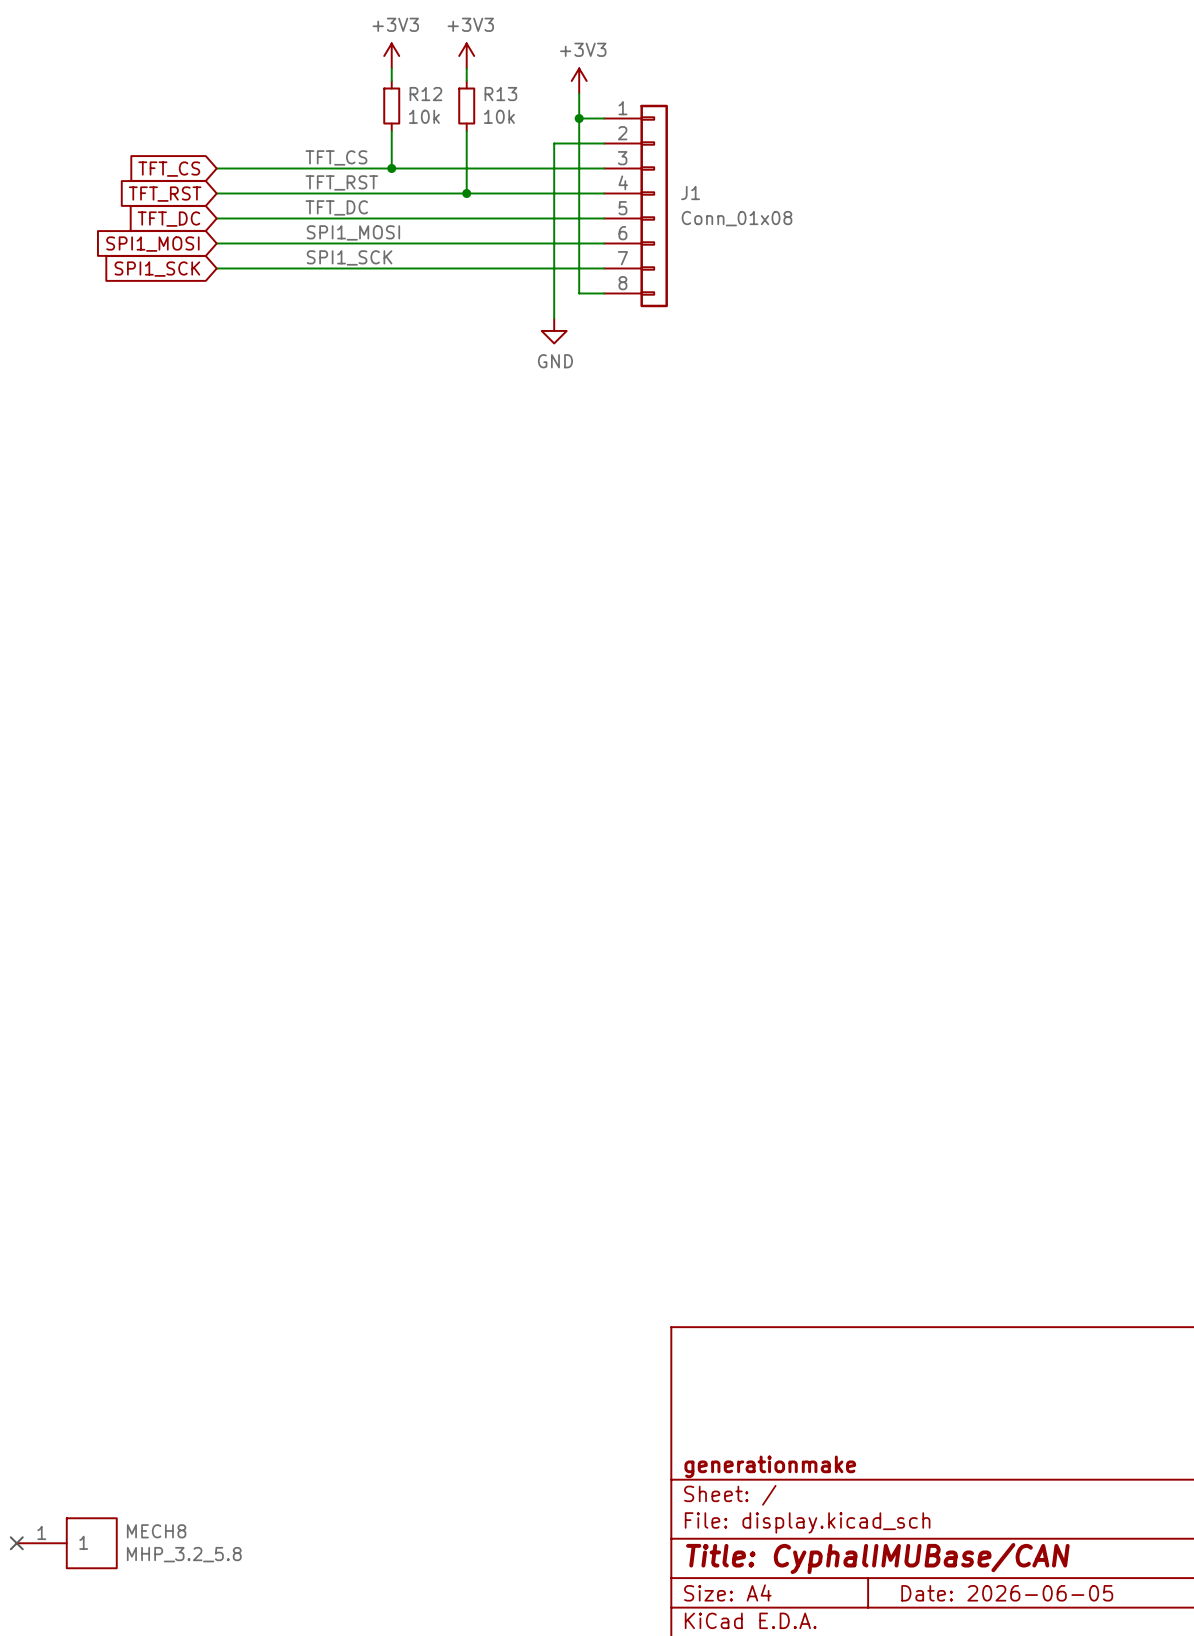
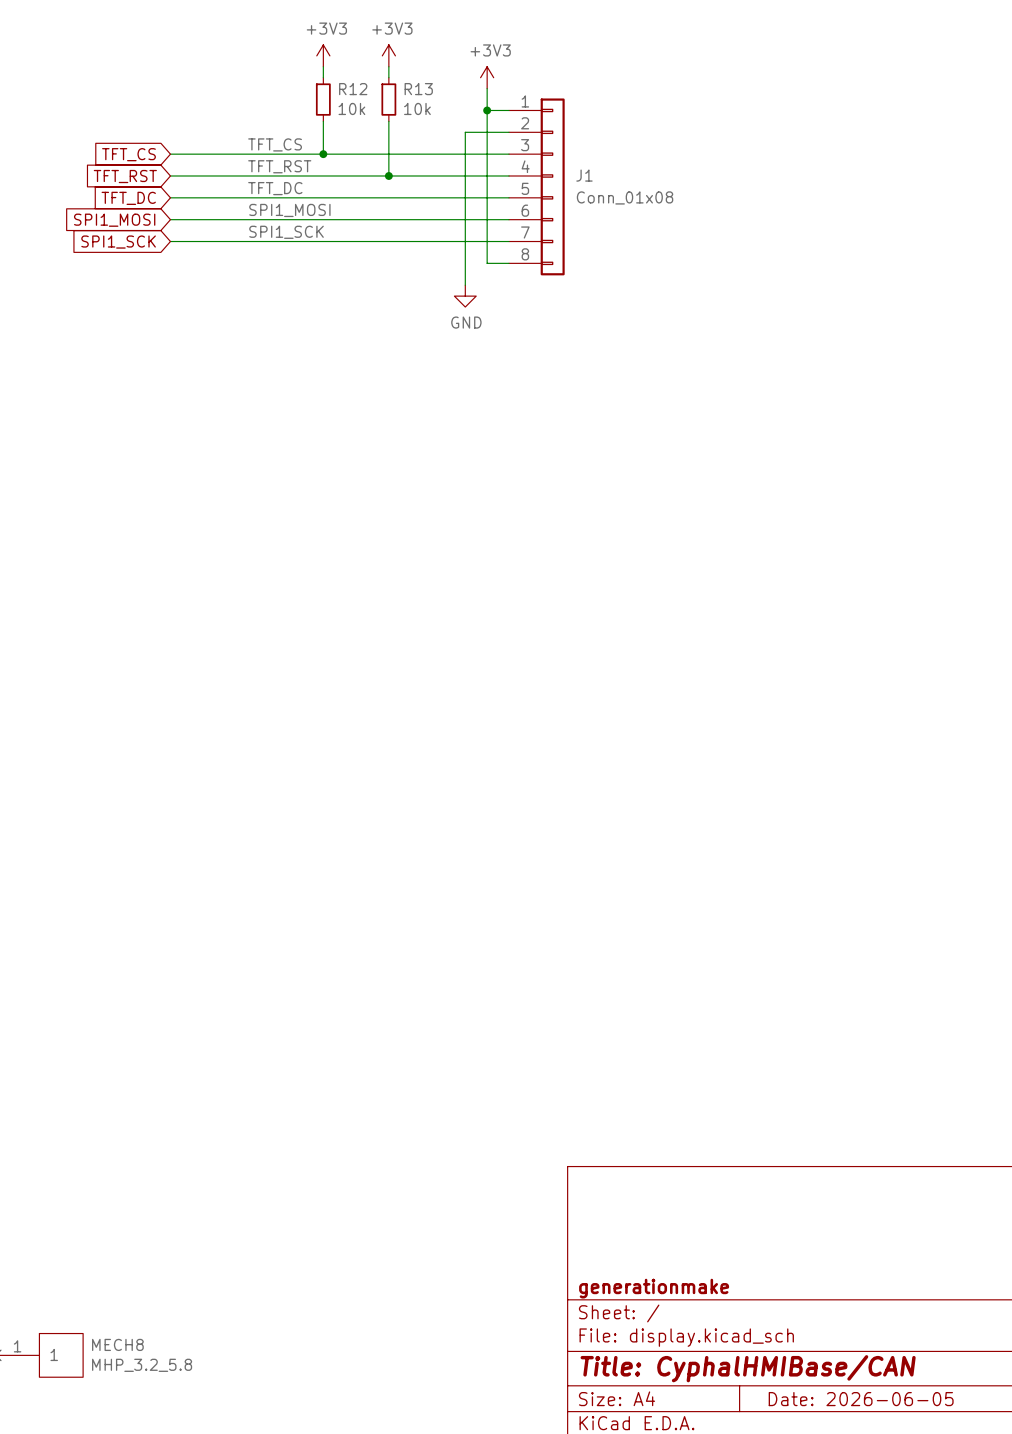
title block: Title: CyphalIMUBase/CAN (877, 1558) -> Title: CyphalHMIBase/CAN (748, 1368)

